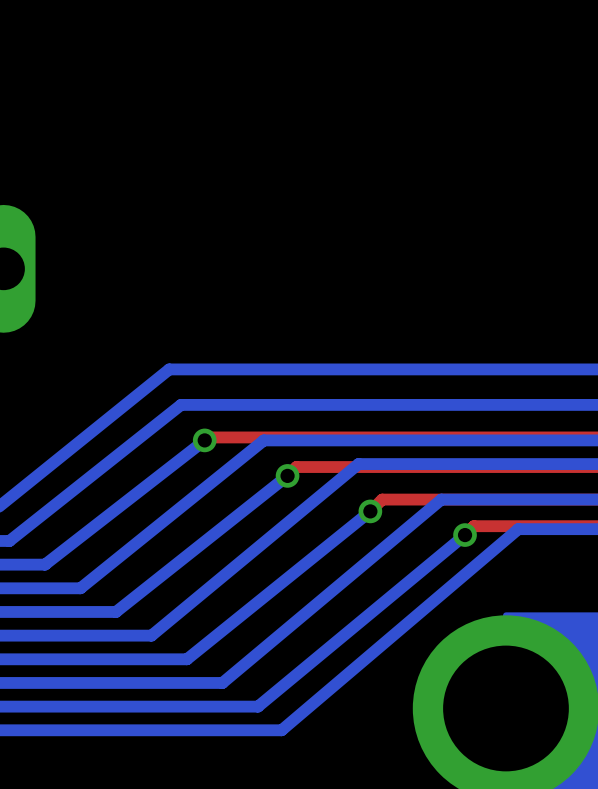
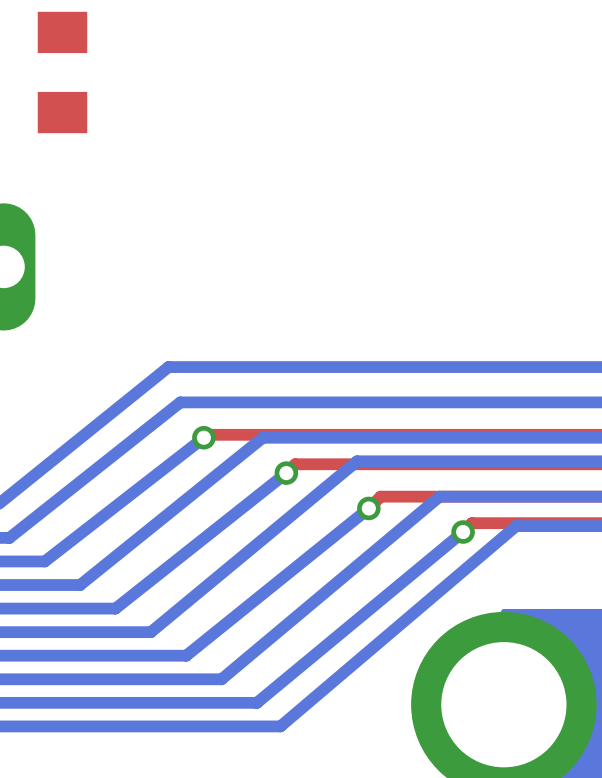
part: none -> (62, 72)

